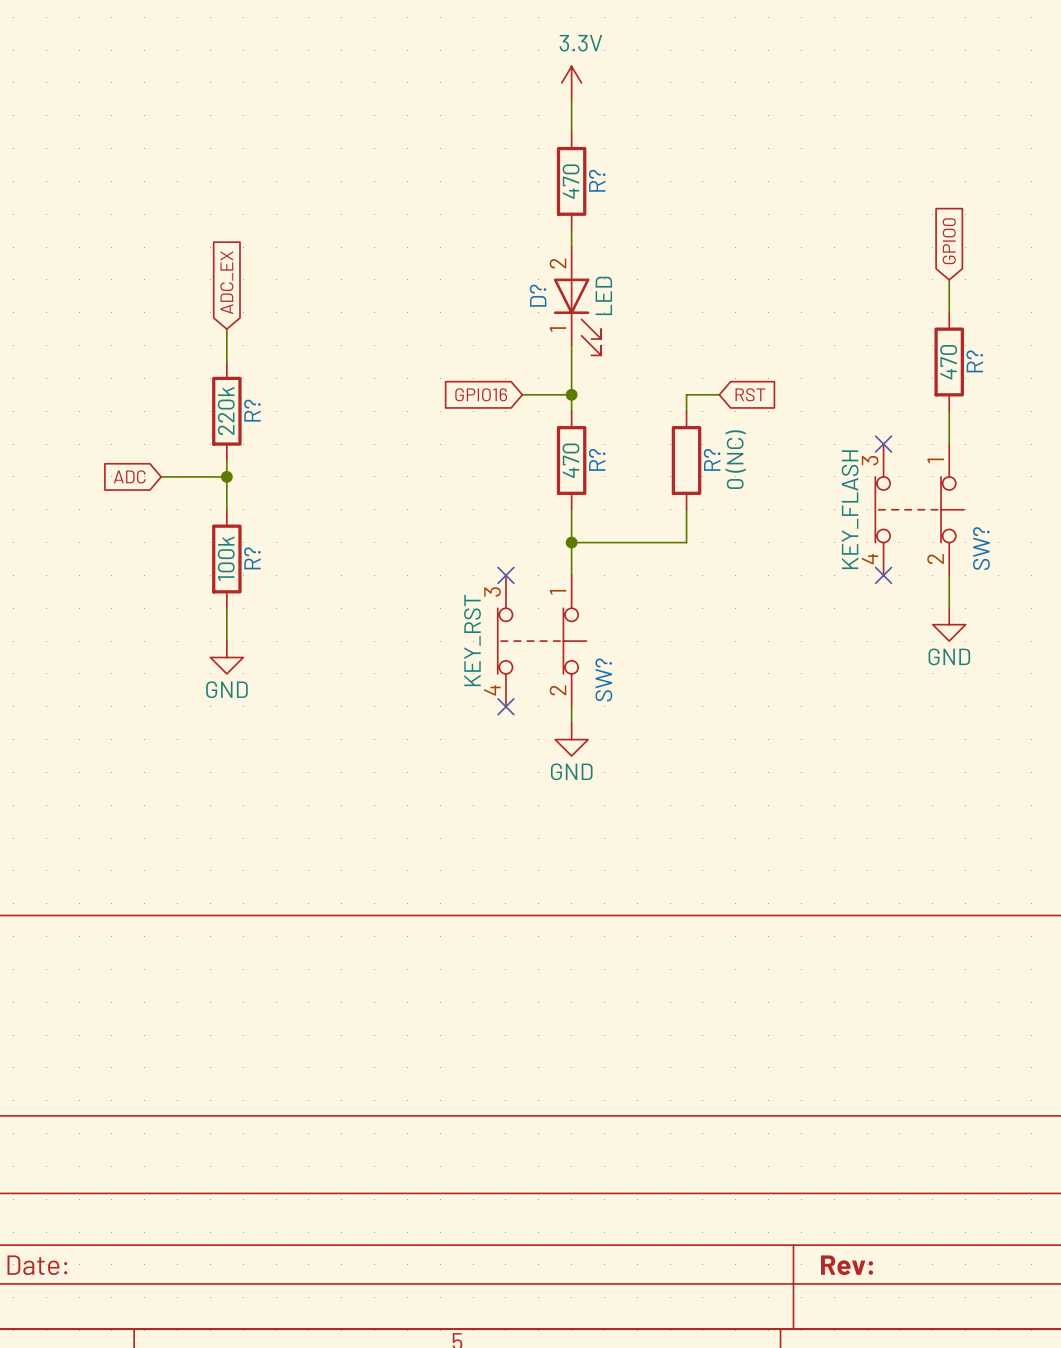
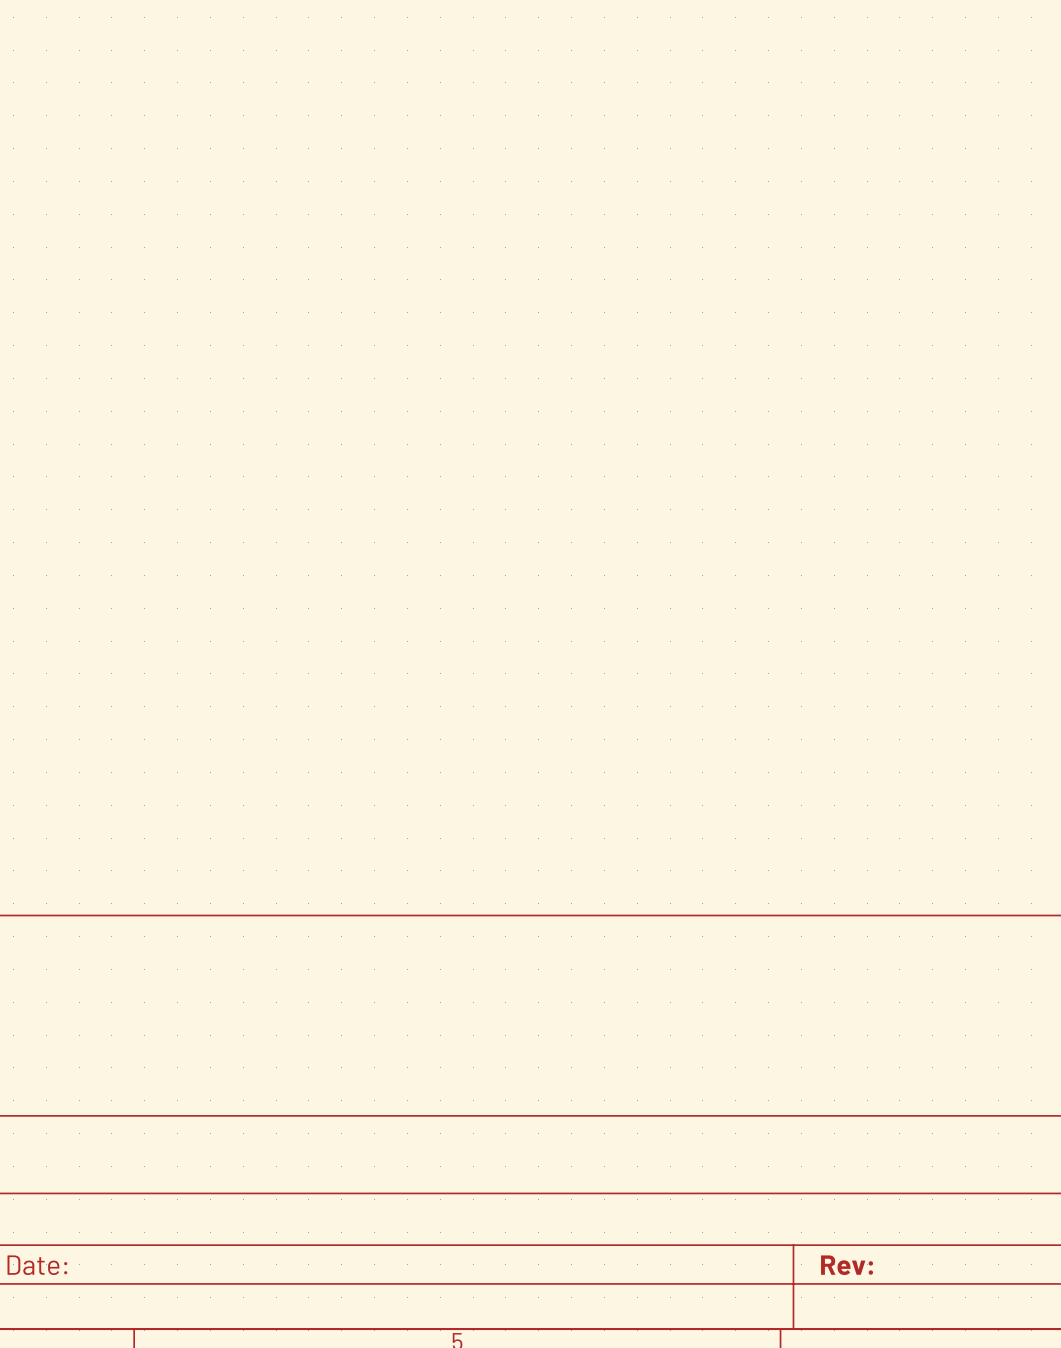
power symbol: 3.3V (571, 82) -> none
wire: (571, 99) (571, 132) -> none
R?: 470 (571, 181) -> none
wire: (571, 230) (571, 247) -> none
global label: GPIO0 (949, 241) -> none
wire: (949, 279) (949, 312) -> none
global label: ADC_EX (226, 282) -> none
D?: LED (577, 301) -> none
wire: (226, 329) (226, 361) -> none
wire: (571, 345) (571, 411) -> none
R?: 470 (949, 361) -> none
global label: GPIO16 (481, 394) -> none
wire: (522, 394) (571, 394) -> none
junction: (571, 394) -> none
wire: (719, 394) (686, 394) (686, 411) -> none
global label: RST (750, 394) -> none
R?: 220k (226, 411) -> none
wire: (949, 411) (949, 444) -> none
no-connect mark: (883, 444) -> none
wire: (226, 460) (226, 509) -> none
R?: 470 (571, 460) -> none
R?: 0 (NC) (686, 460) -> none
global label: ADC (129, 476) -> none
wire: (161, 476) (226, 476) -> none
junction: (226, 476) -> none
wire: (571, 509) (571, 575) -> none
wire: (686, 509) (686, 542) (571, 542) -> none
SW?: KEY_FLASH (919, 509) -> none
junction: (571, 542) -> none
R?: 100k (226, 558) -> none
no-connect mark: (505, 575) -> none
no-connect mark: (883, 575) -> none
wire: (949, 575) (949, 608) -> none
wire: (226, 608) (226, 641) -> none
power symbol: GND (949, 624) -> none
SW?: KEY_RST (542, 641) -> none
power symbol: GND (226, 657) -> none
no-connect mark: (505, 706) -> none
wire: (571, 706) (571, 723) -> none
power symbol: GND (571, 739) -> none

